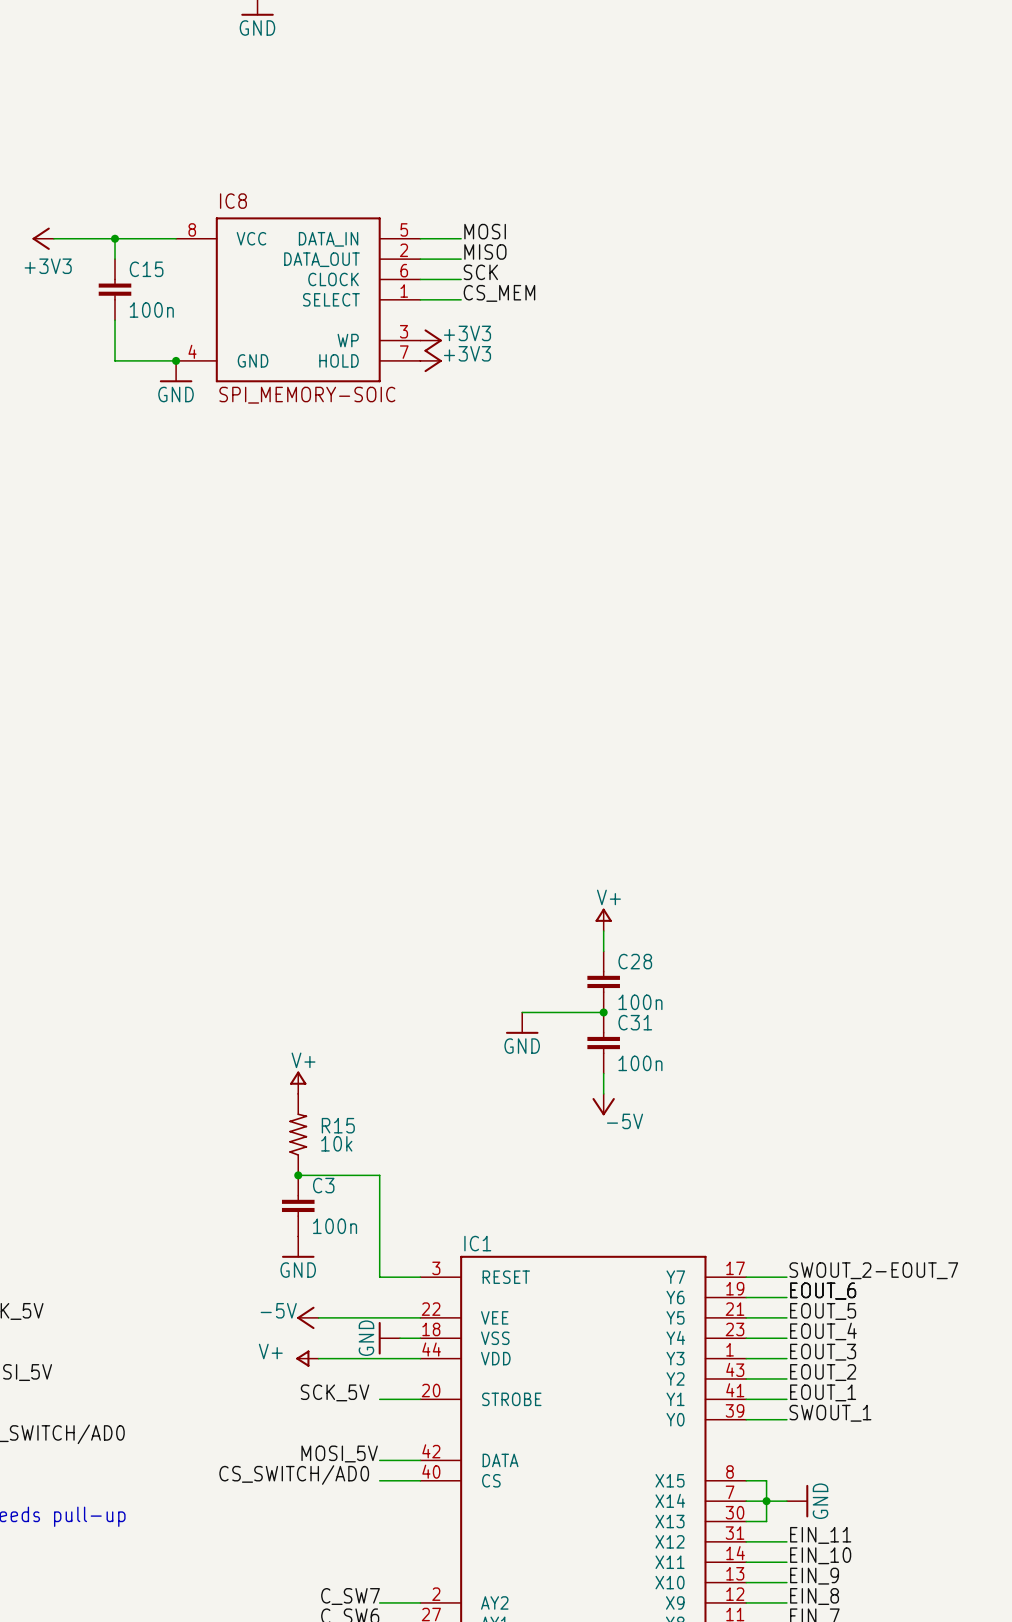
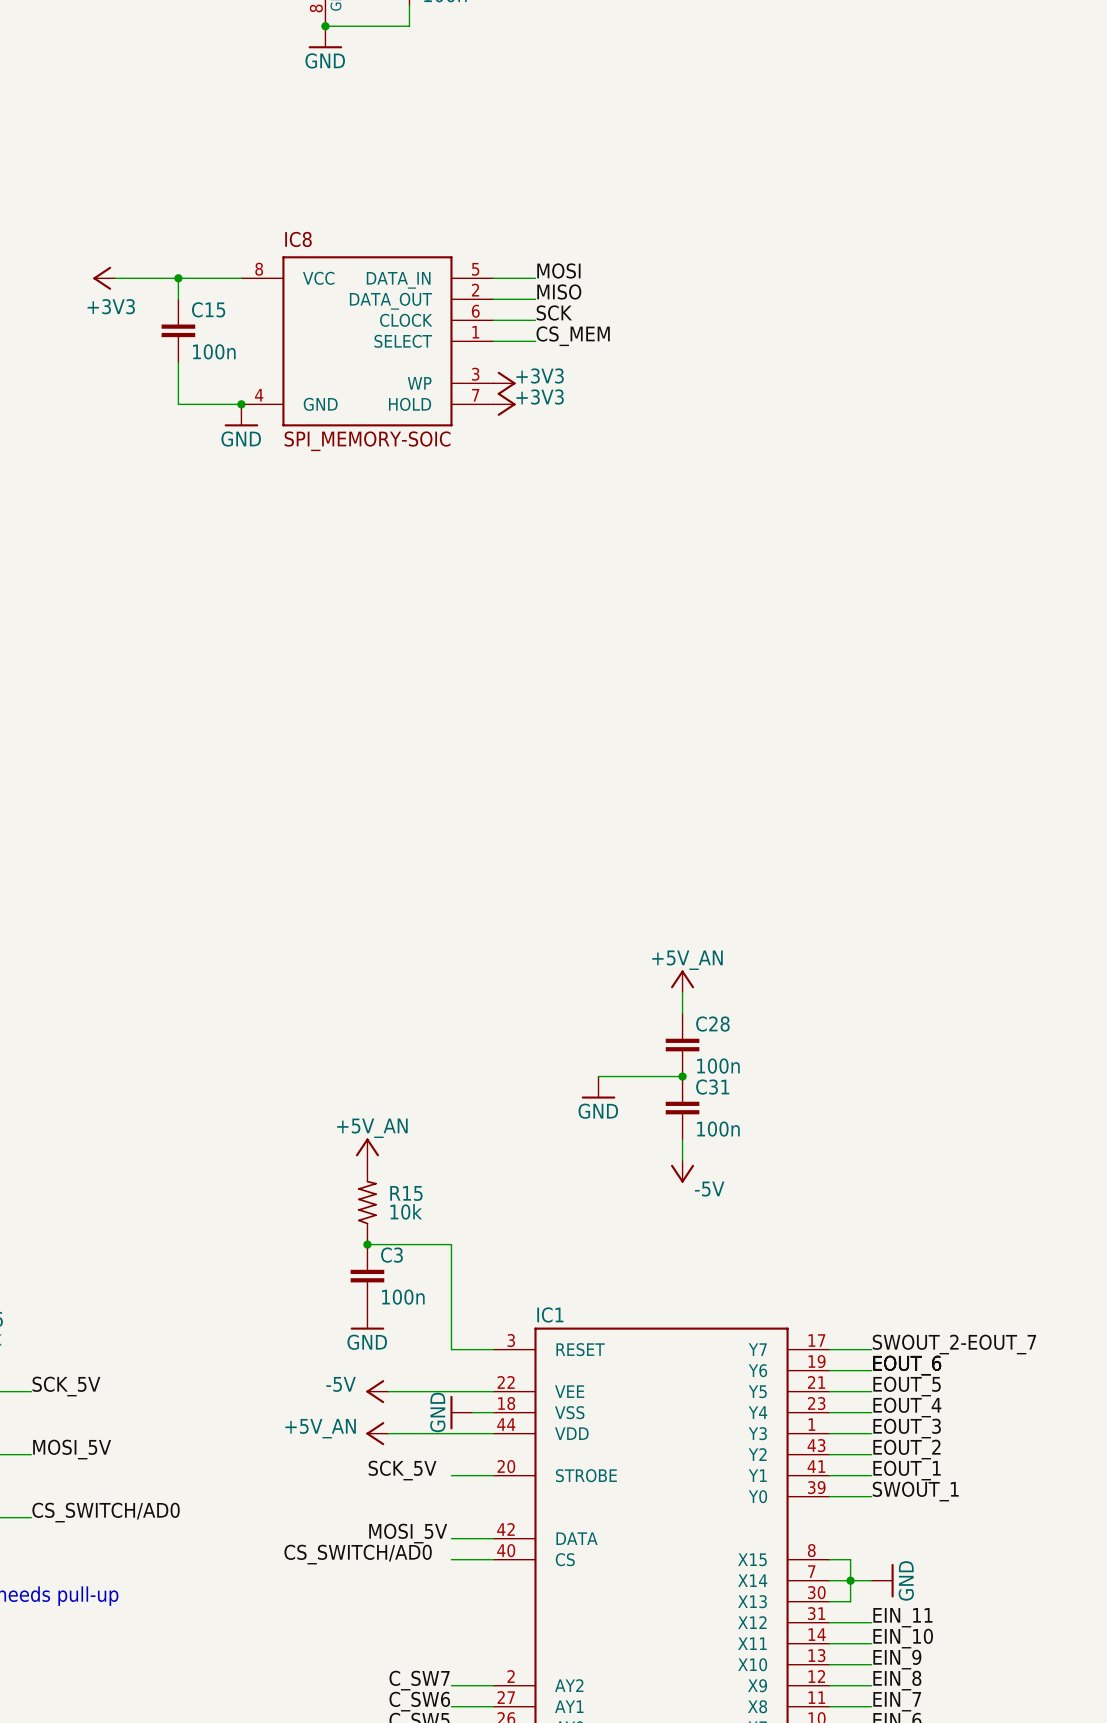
power symbol: V+ (603, 919) -> +5V_AN (682, 981)
power symbol: V+ (298, 1082) -> +5V_AN (367, 1149)
power symbol: V+ (307, 1358) -> +5V_AN (377, 1433)

